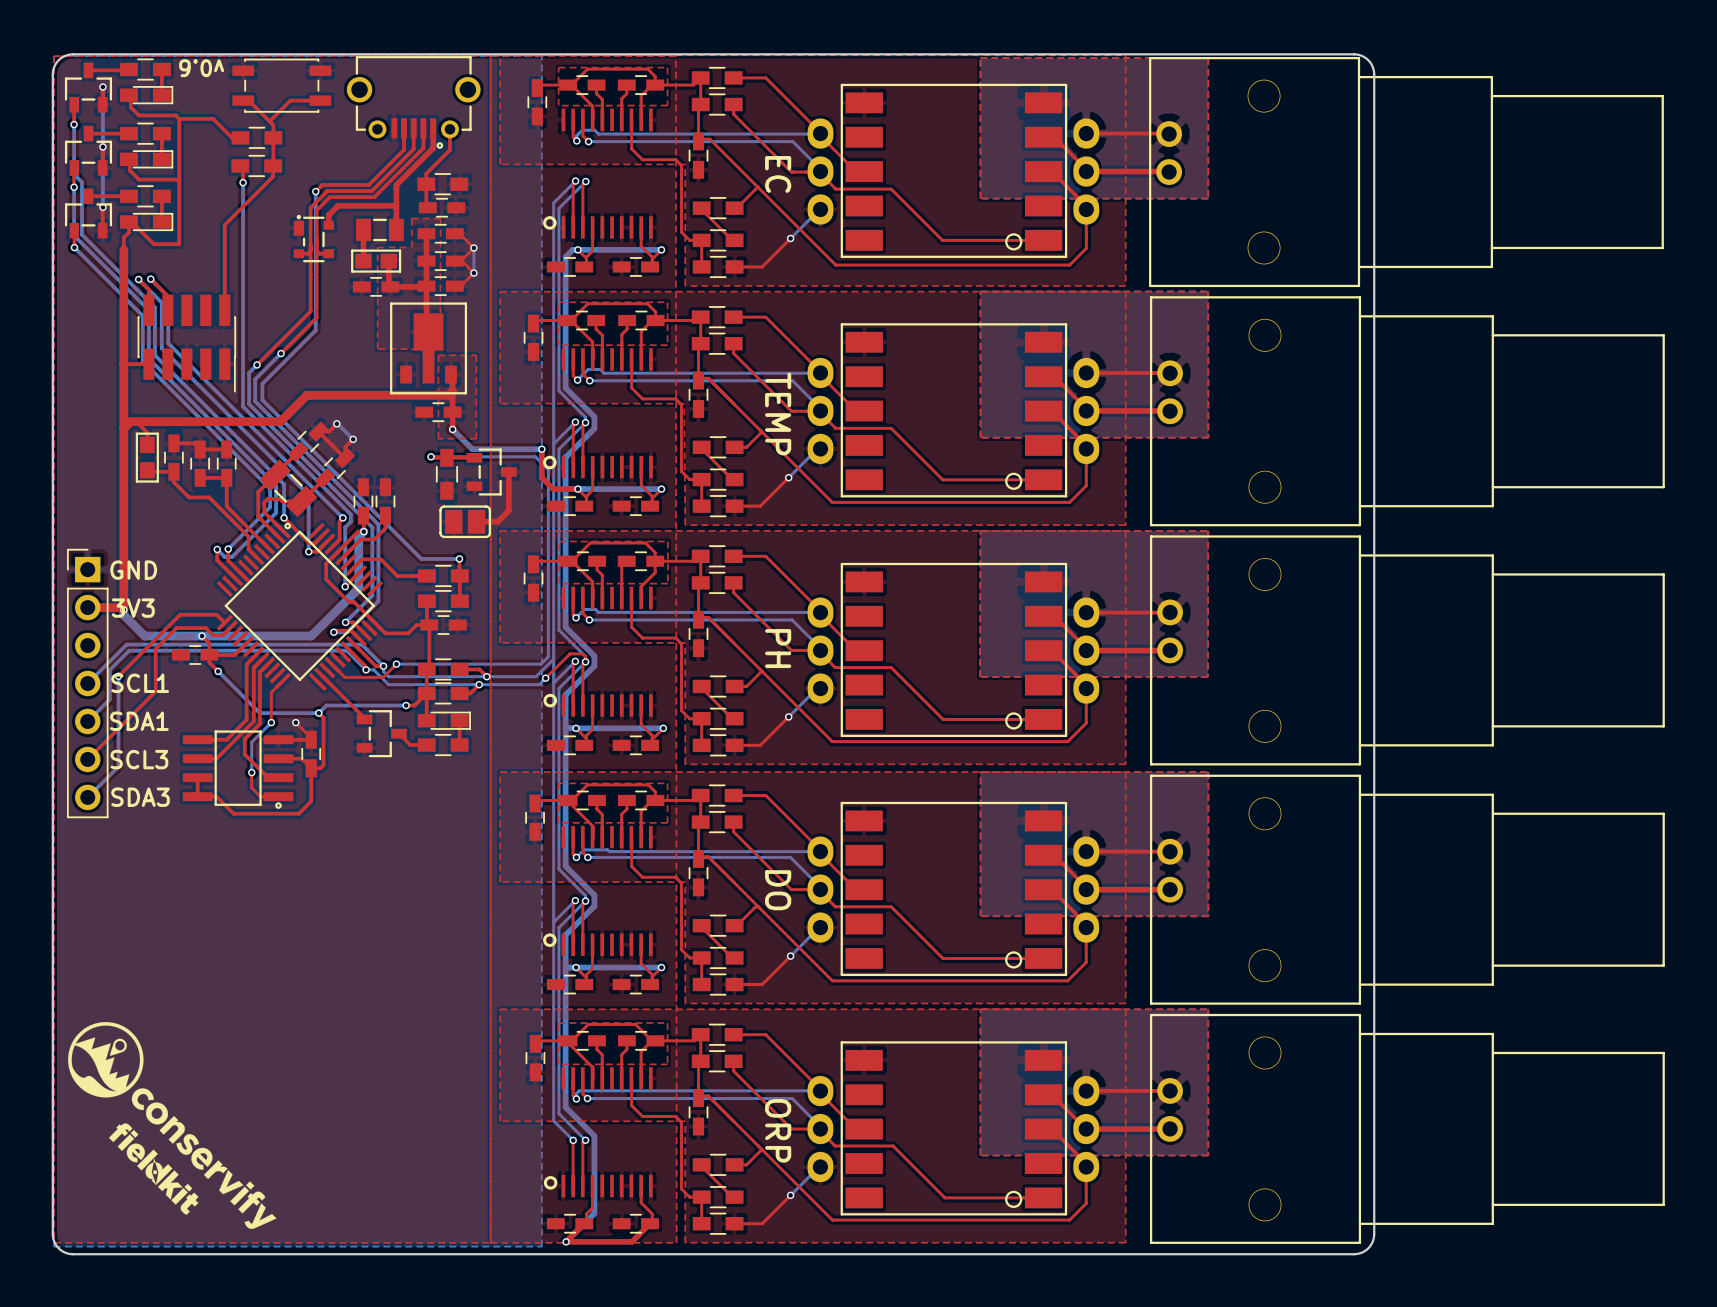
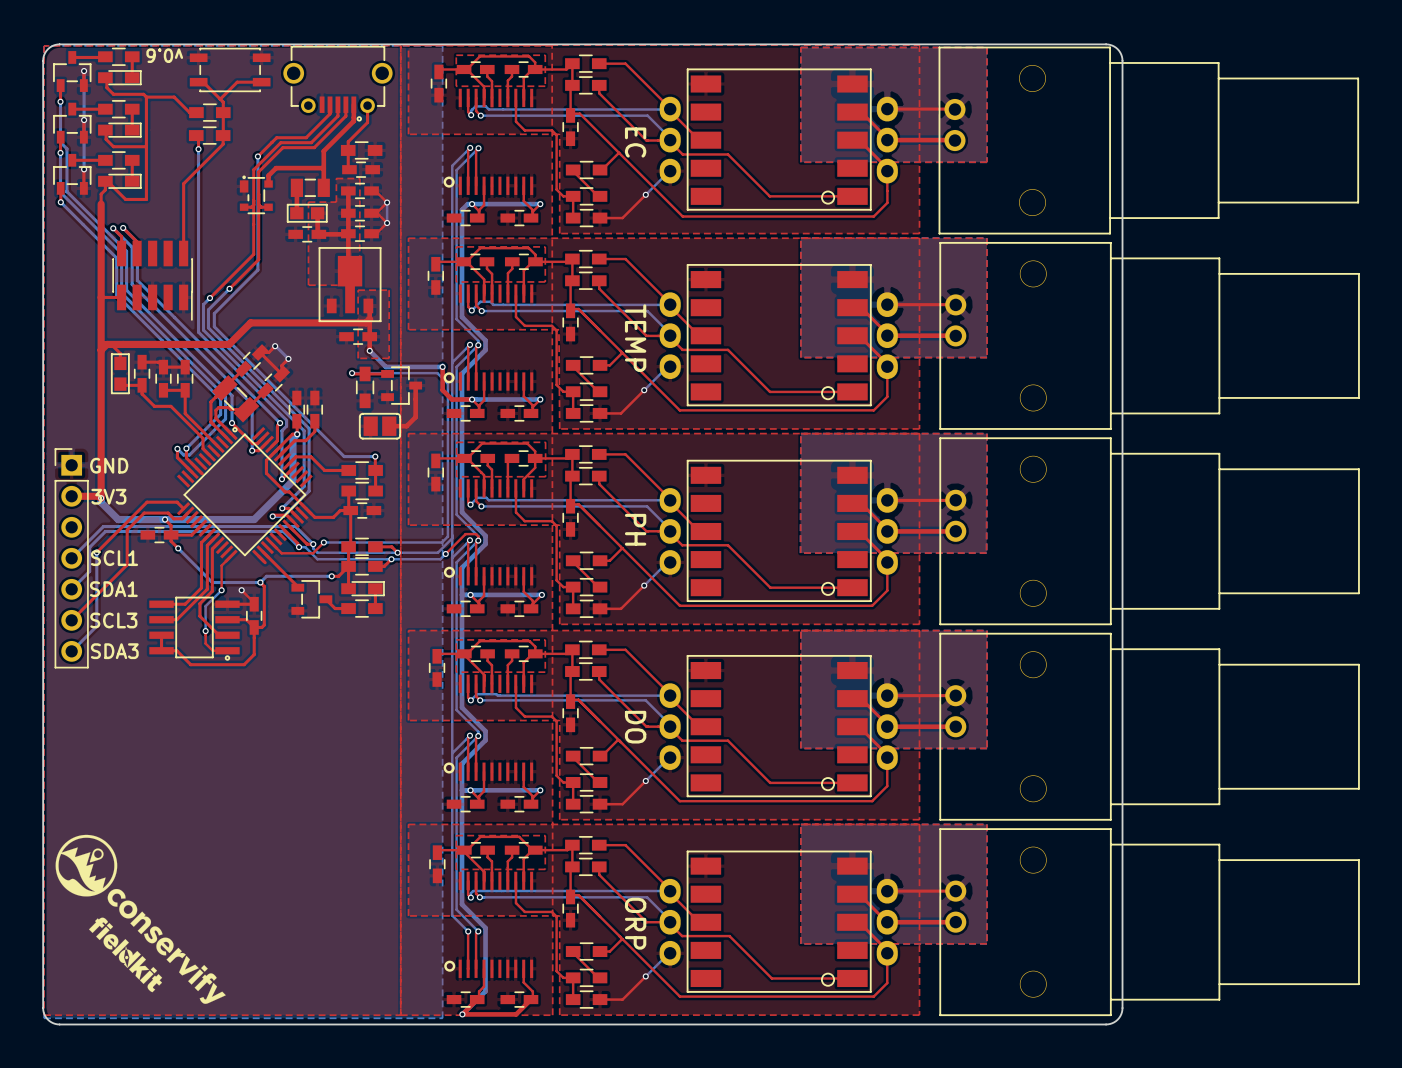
top track: (404, 139) (404, 149) (368, 184) (322, 184) -> (330, 113) (306, 137) (276, 137) (263, 151)
top track: (413, 142) (413, 149) (371, 191) (327, 191) -> (337, 116) (311, 142) (280, 142) (267, 156)
top track: (423, 142) (423, 148) (374, 197) (330, 197) -> (345, 116) (314, 147) (282, 147) (269, 160)

